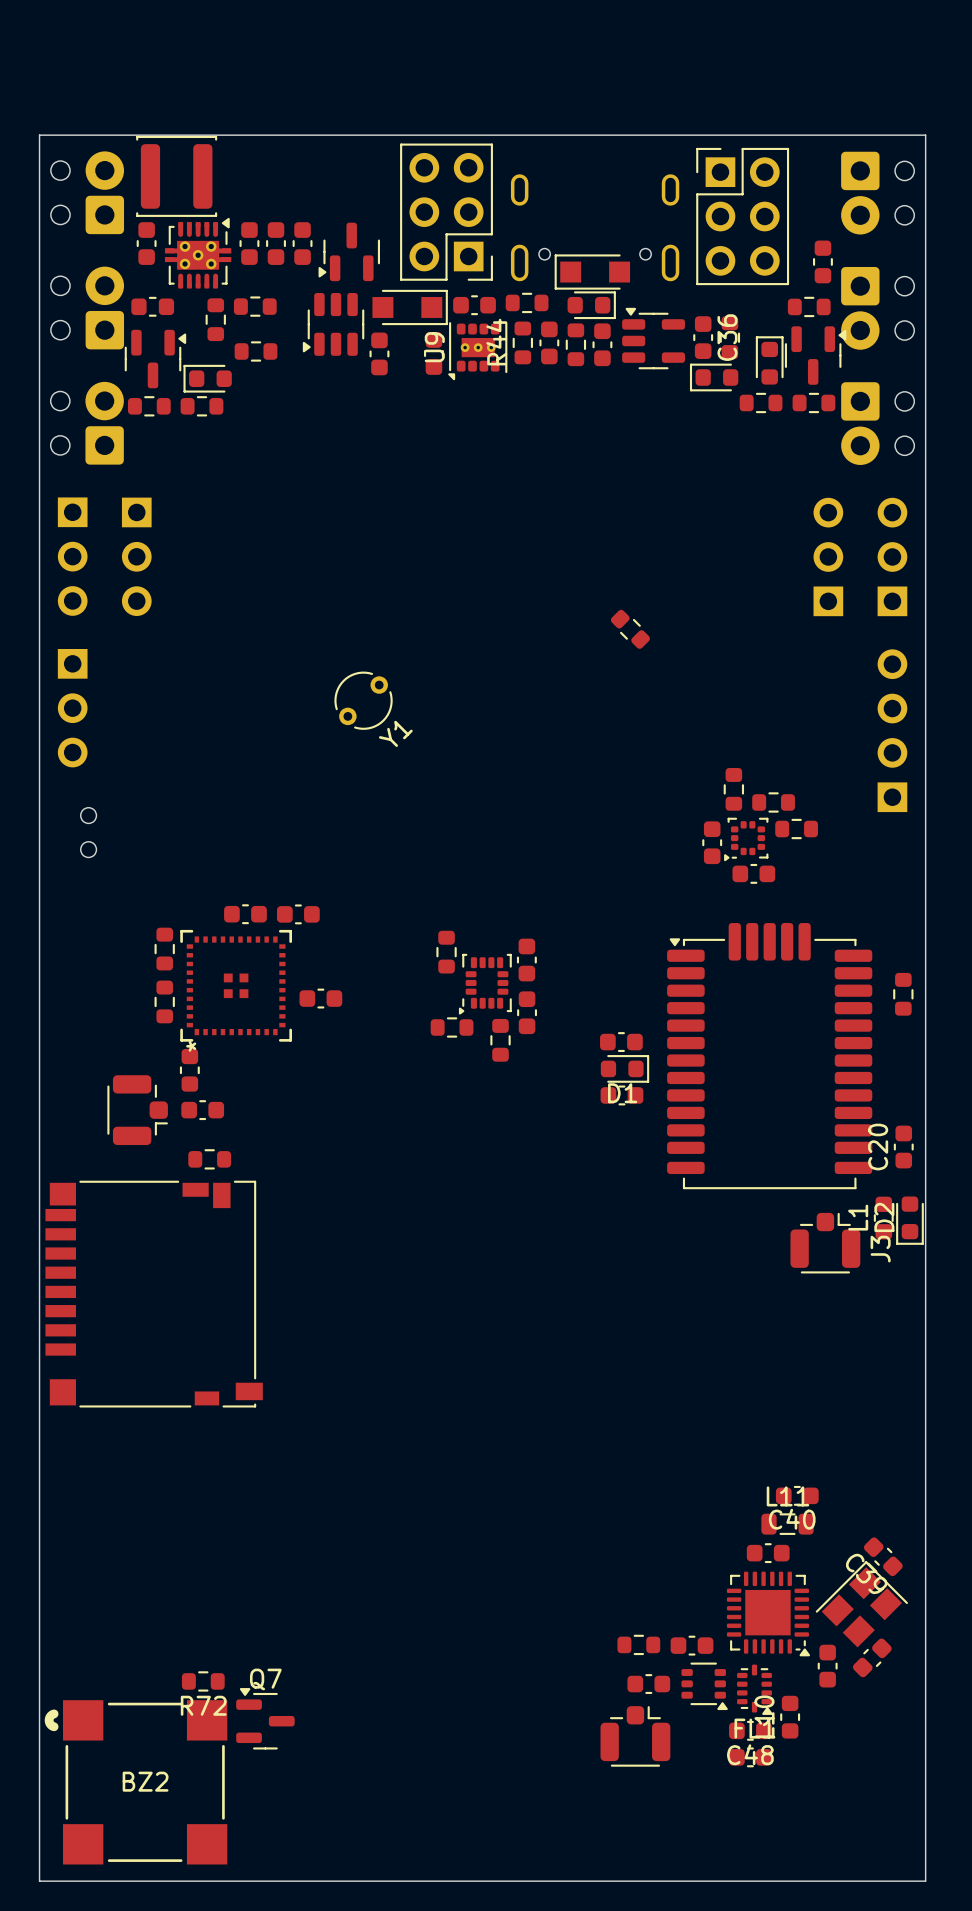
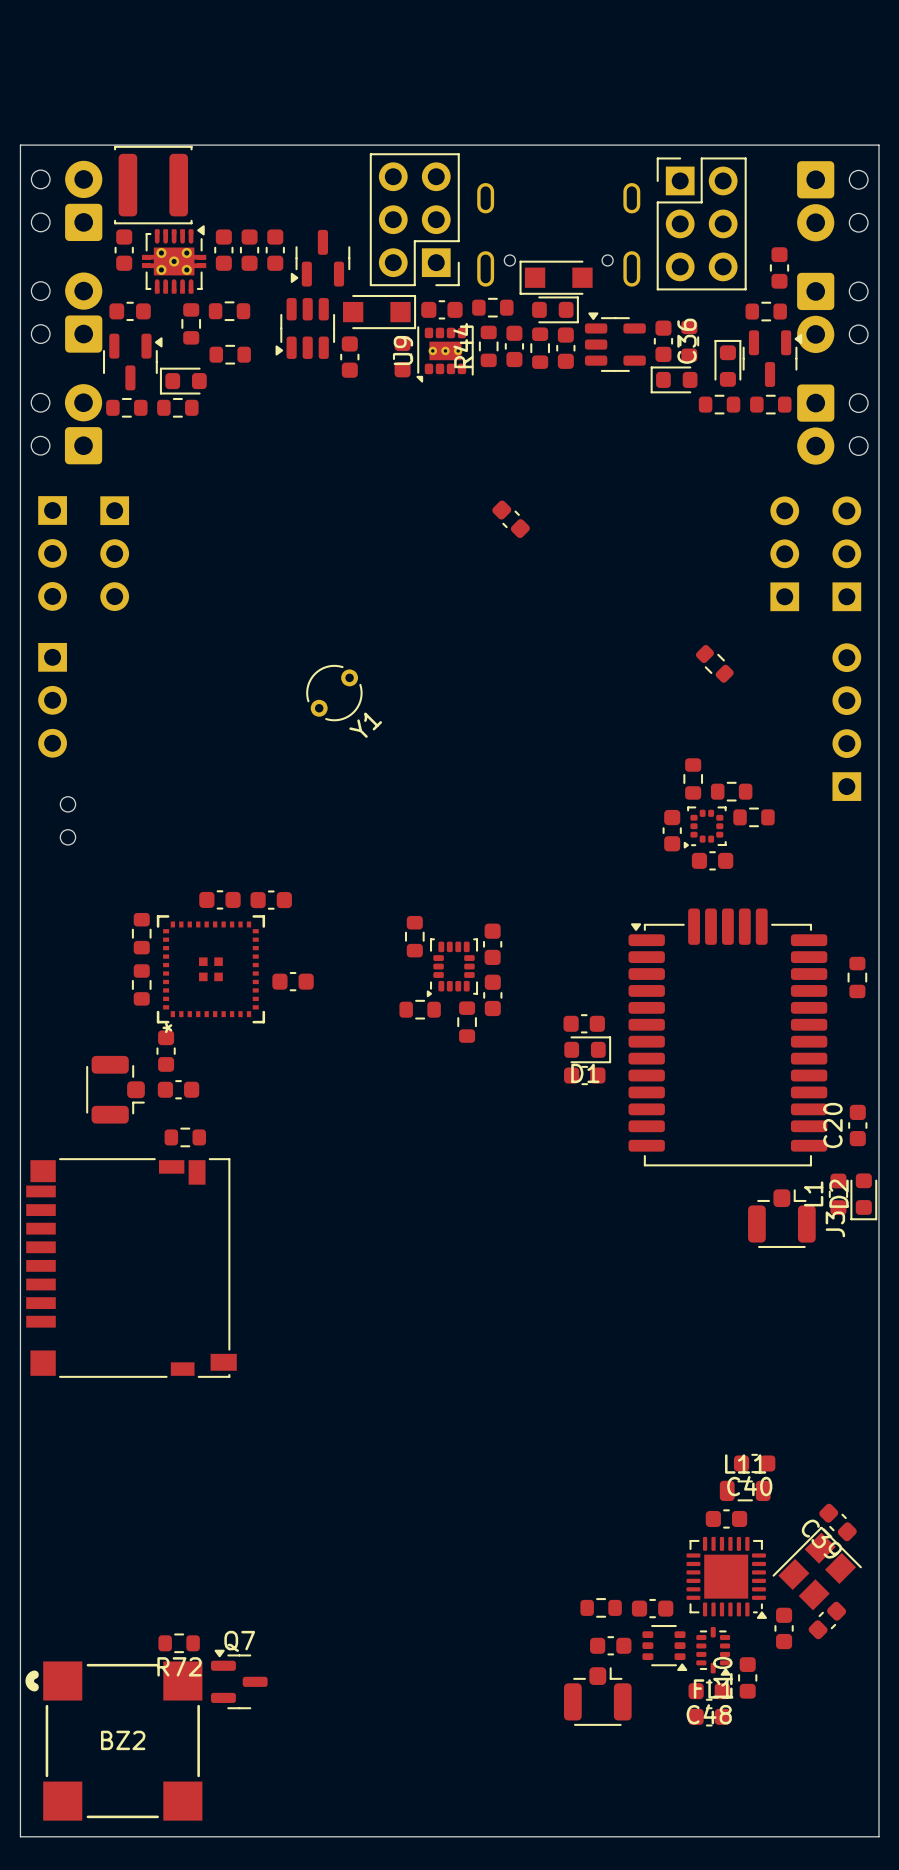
part: none -> (511, 519)
part position: (630, 629) -> (714, 663)

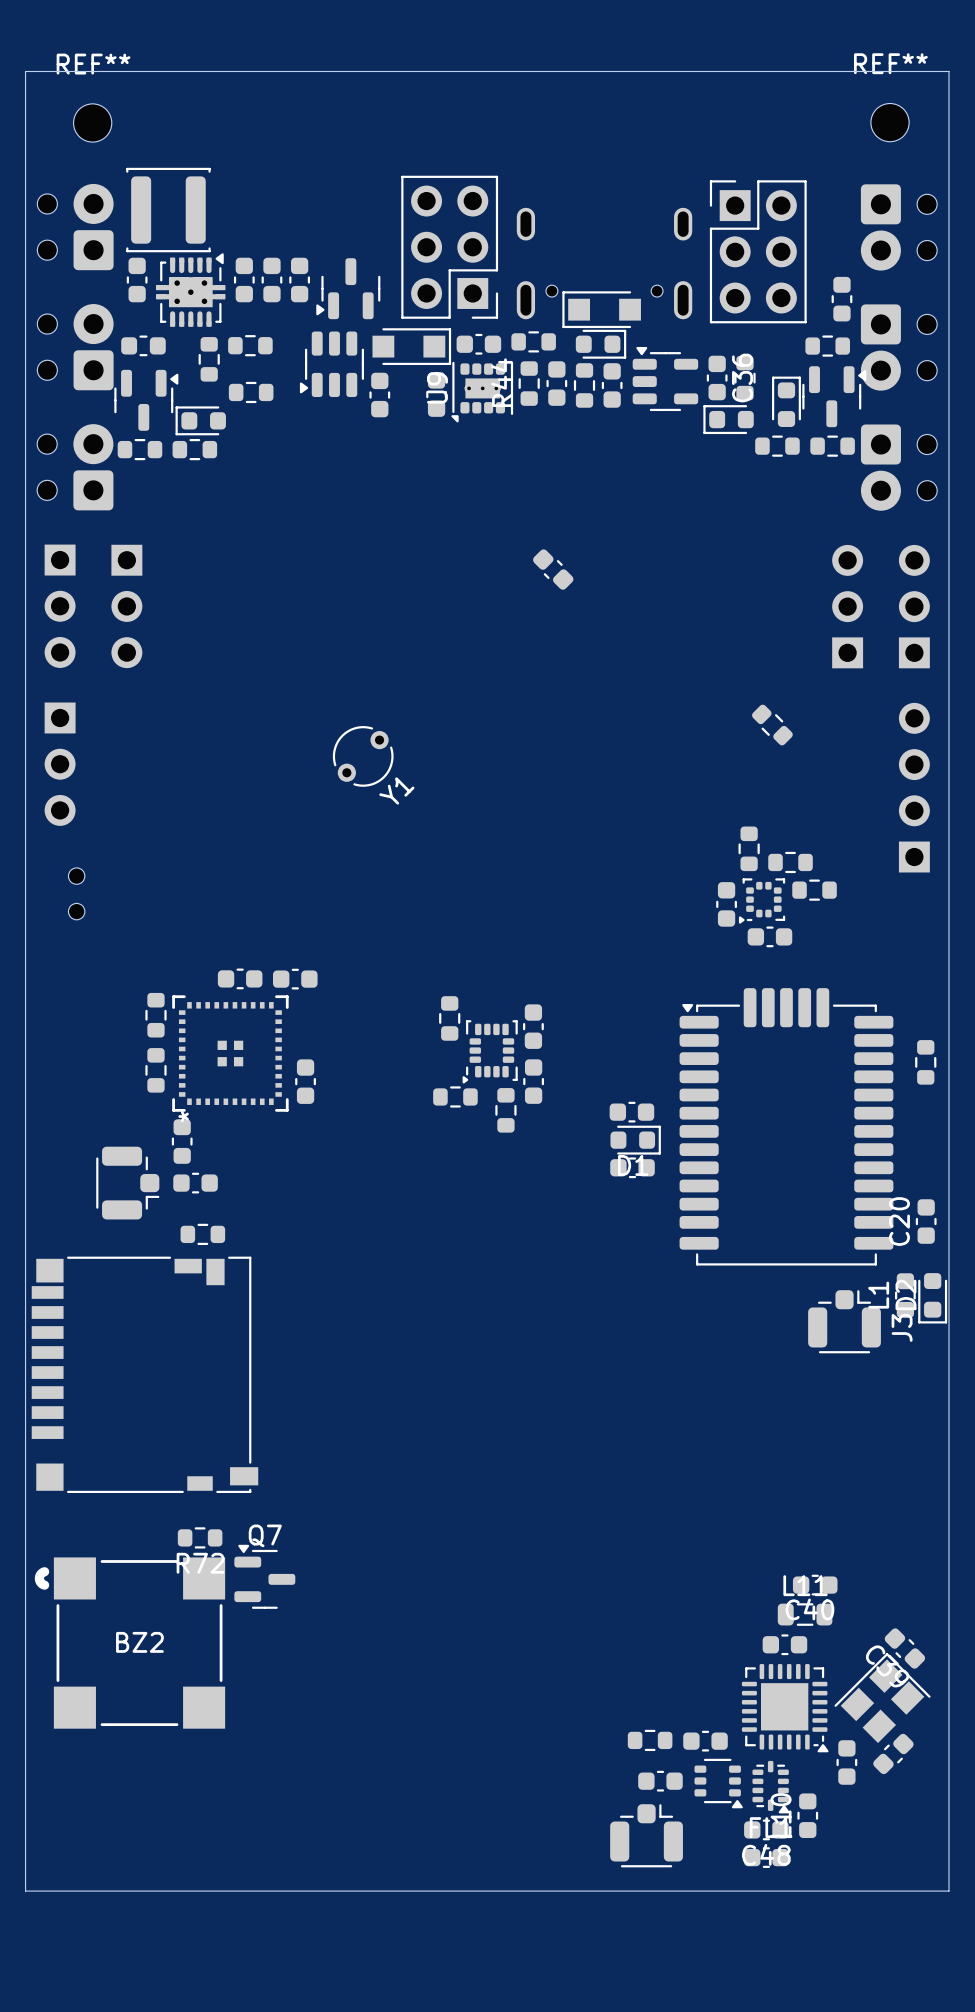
REF**: none -> (890, 122)
REF**: none -> (92, 122)
board edge: (20, 145) (878, 145) -> (25, 167) (25, 71) (948, 71) (948, 167)
part rotation: 0° (293, 981) -> 90° clockwise (305, 1081)
R72 position: (179, 1643) -> (200, 1537)
Q7 position: (239, 1679) -> (264, 1576)
BZ2 position: (113, 1741) -> (129, 1643)
board edge: (20, 1747) (20, 1836) (878, 1836) (878, 1747) -> (25, 1891) (948, 1891)

